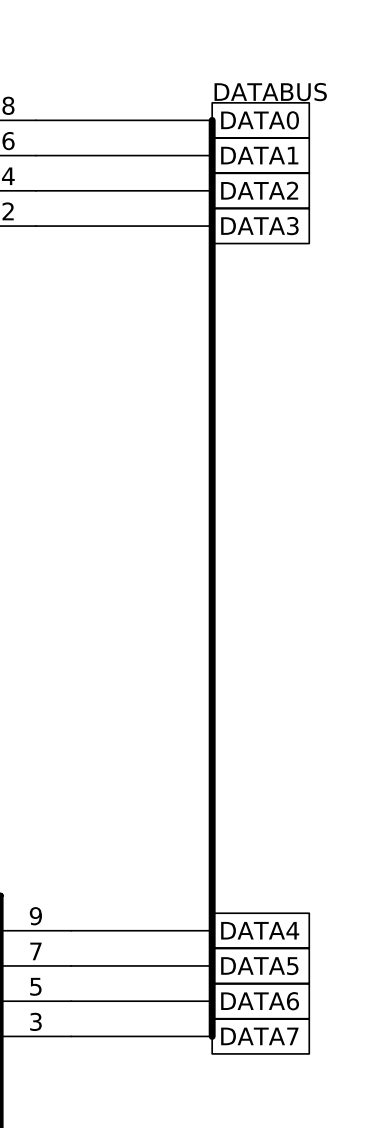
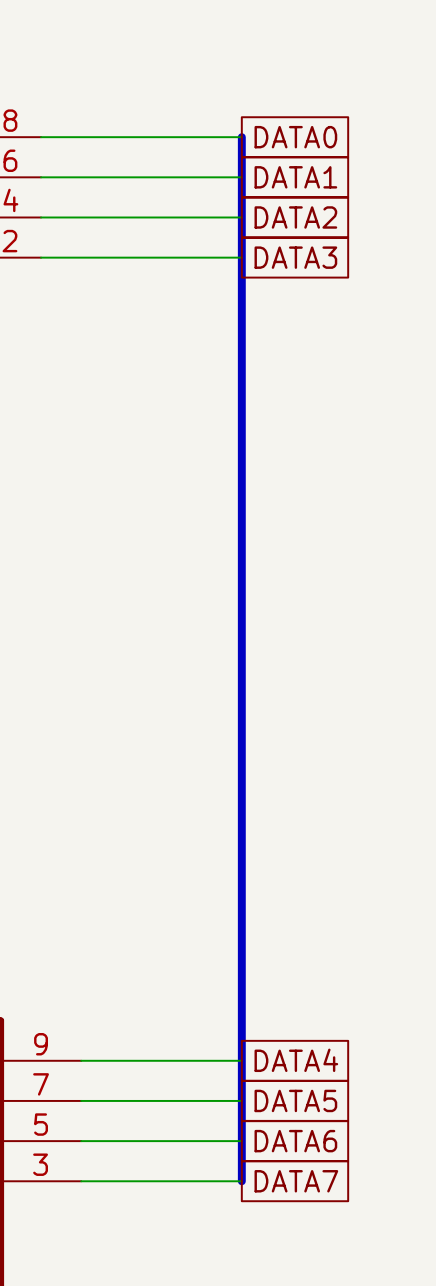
text: DATABUS (270, 92) -> none

